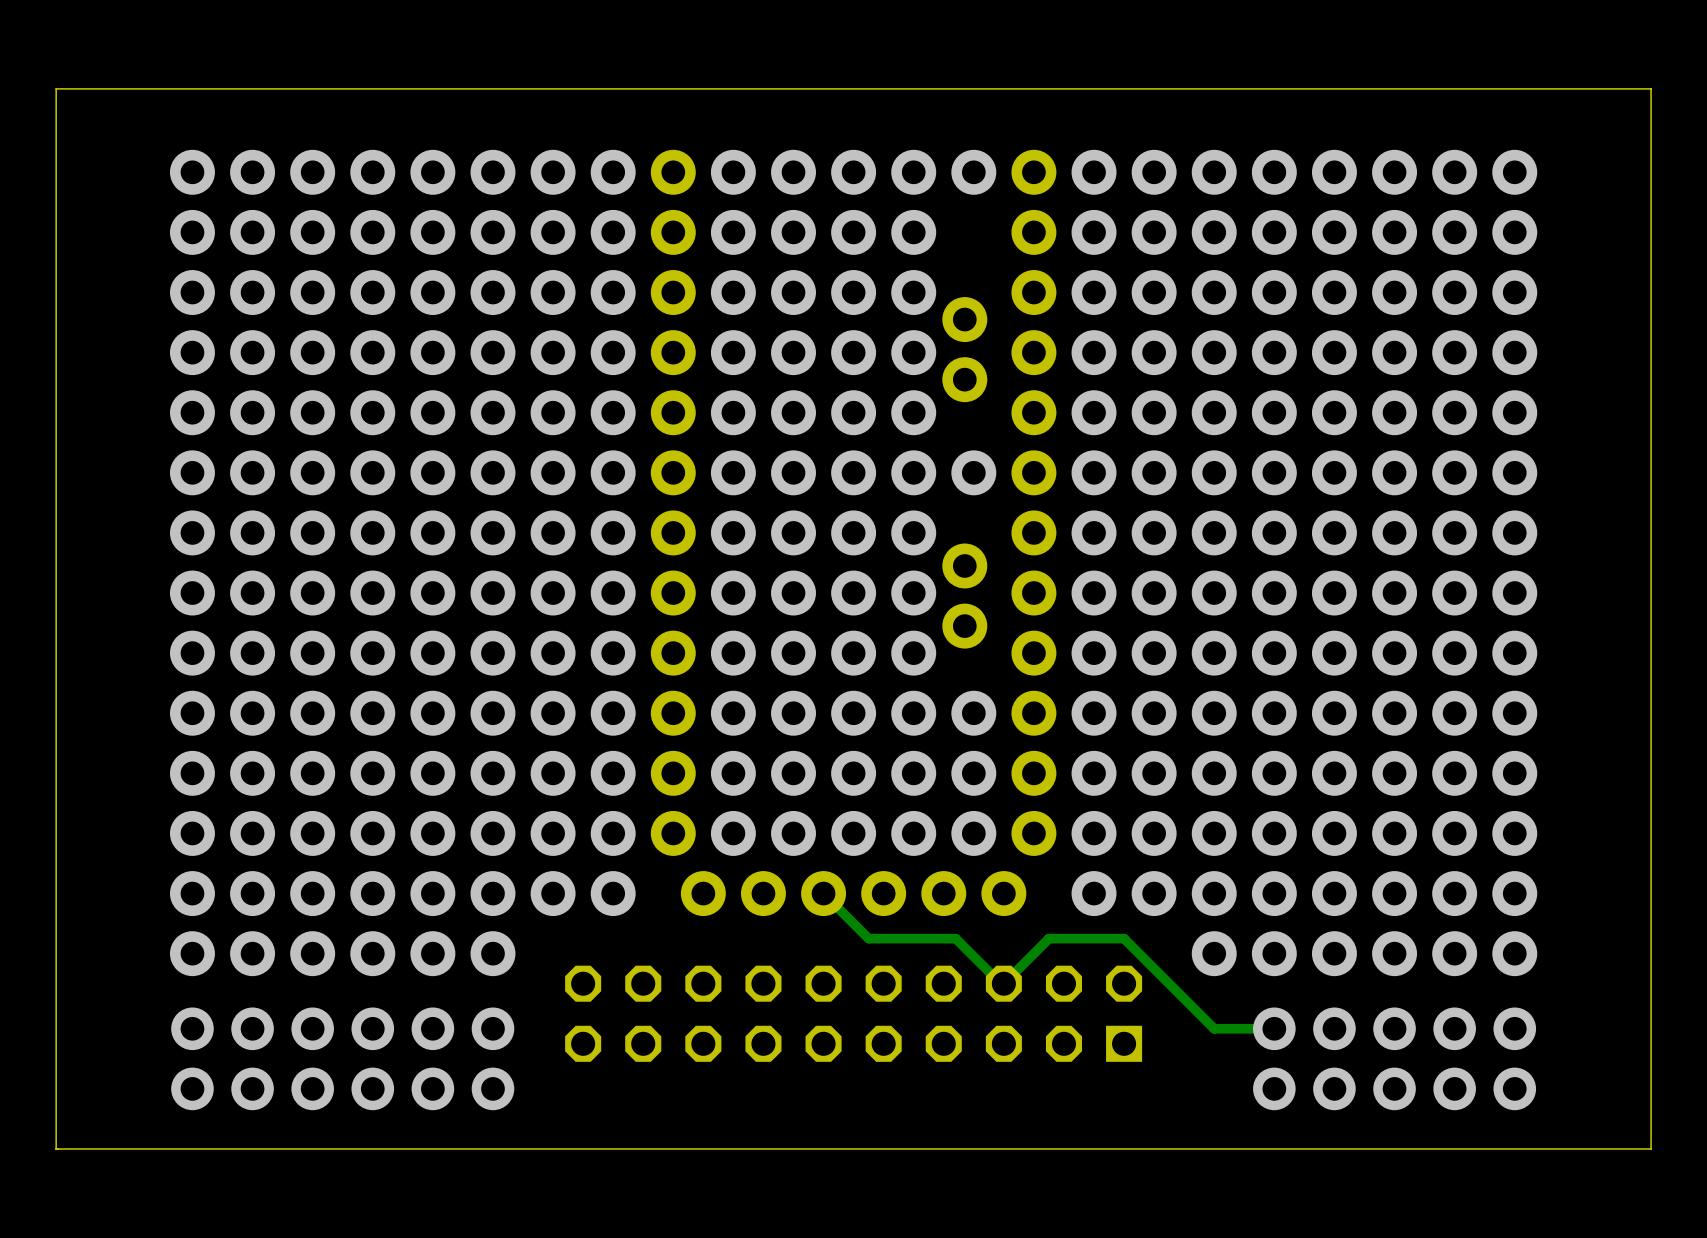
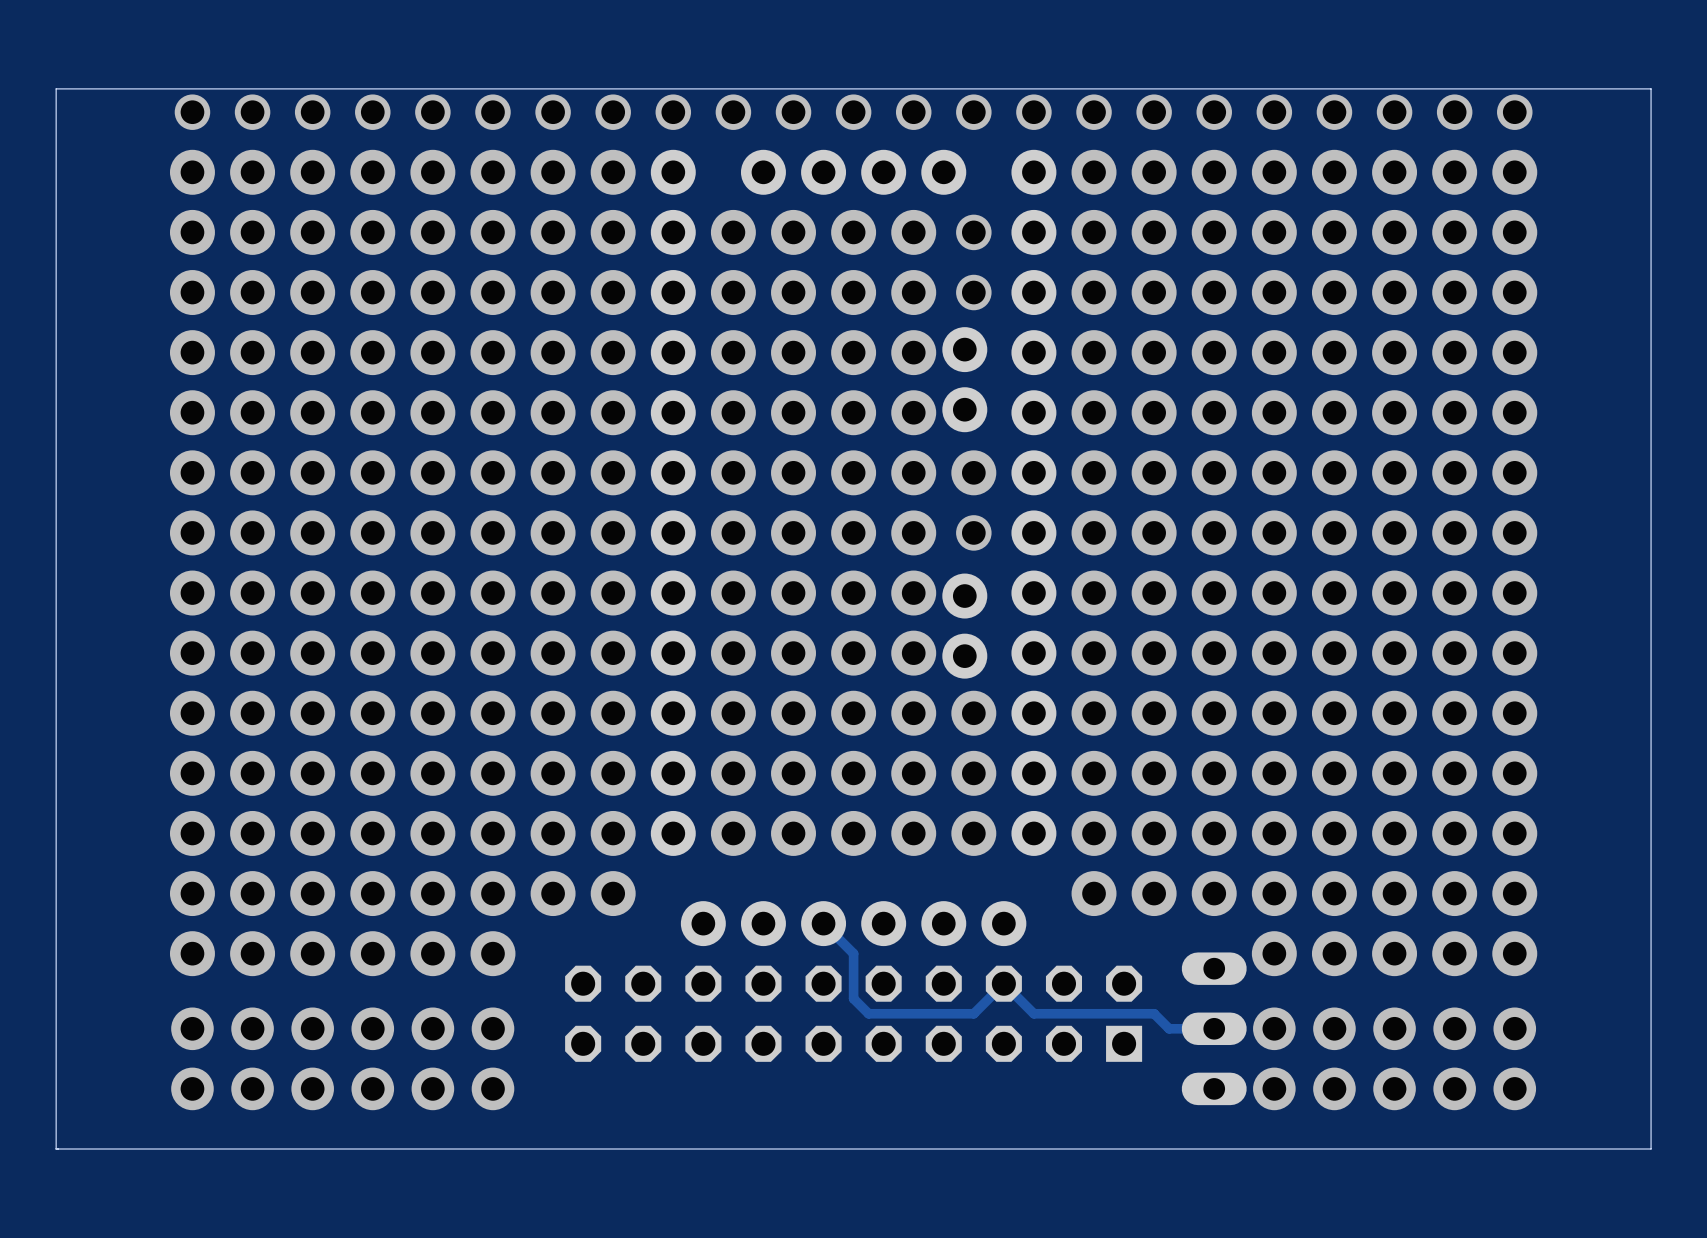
via: none -> (192, 112)
via: none -> (252, 112)
via: none -> (312, 112)
via: none -> (372, 112)
via: none -> (432, 112)
via: none -> (492, 112)
via: none -> (553, 112)
via: none -> (613, 112)
via: none -> (673, 112)
via: none -> (733, 112)
via: none -> (793, 112)
via: none -> (853, 112)
via: none -> (913, 112)
via: none -> (973, 112)
via: none -> (1033, 112)
via: none -> (1094, 112)
via: none -> (1154, 112)
via: none -> (1214, 112)
via: none -> (1274, 112)
via: none -> (1334, 112)
via: none -> (1394, 112)
via: none -> (1454, 112)
via: none -> (1514, 112)
part footprint: [650, 149, 1057, 917] -> [650, 149, 1057, 947]
via: (733, 172) -> none
via: (793, 172) -> none
via: (853, 172) -> none
via: (913, 172) -> none
via: (973, 172) -> none
via: none -> (973, 232)
via: none -> (973, 292)
via: none -> (973, 532)
track: (823, 893) (868, 938) (955, 938) (1000, 983) (1003, 983) (1048, 938) (1124, 938) (1214, 1028) (1274, 1028) -> none
track: none -> (823, 923) (853, 953) (853, 998) (868, 1013) (973, 1013) (1003, 983) (1033, 1013) (1154, 1013) (1169, 1028) (1214, 1028)
via: (1214, 953) -> none
part: none -> (1214, 1028)

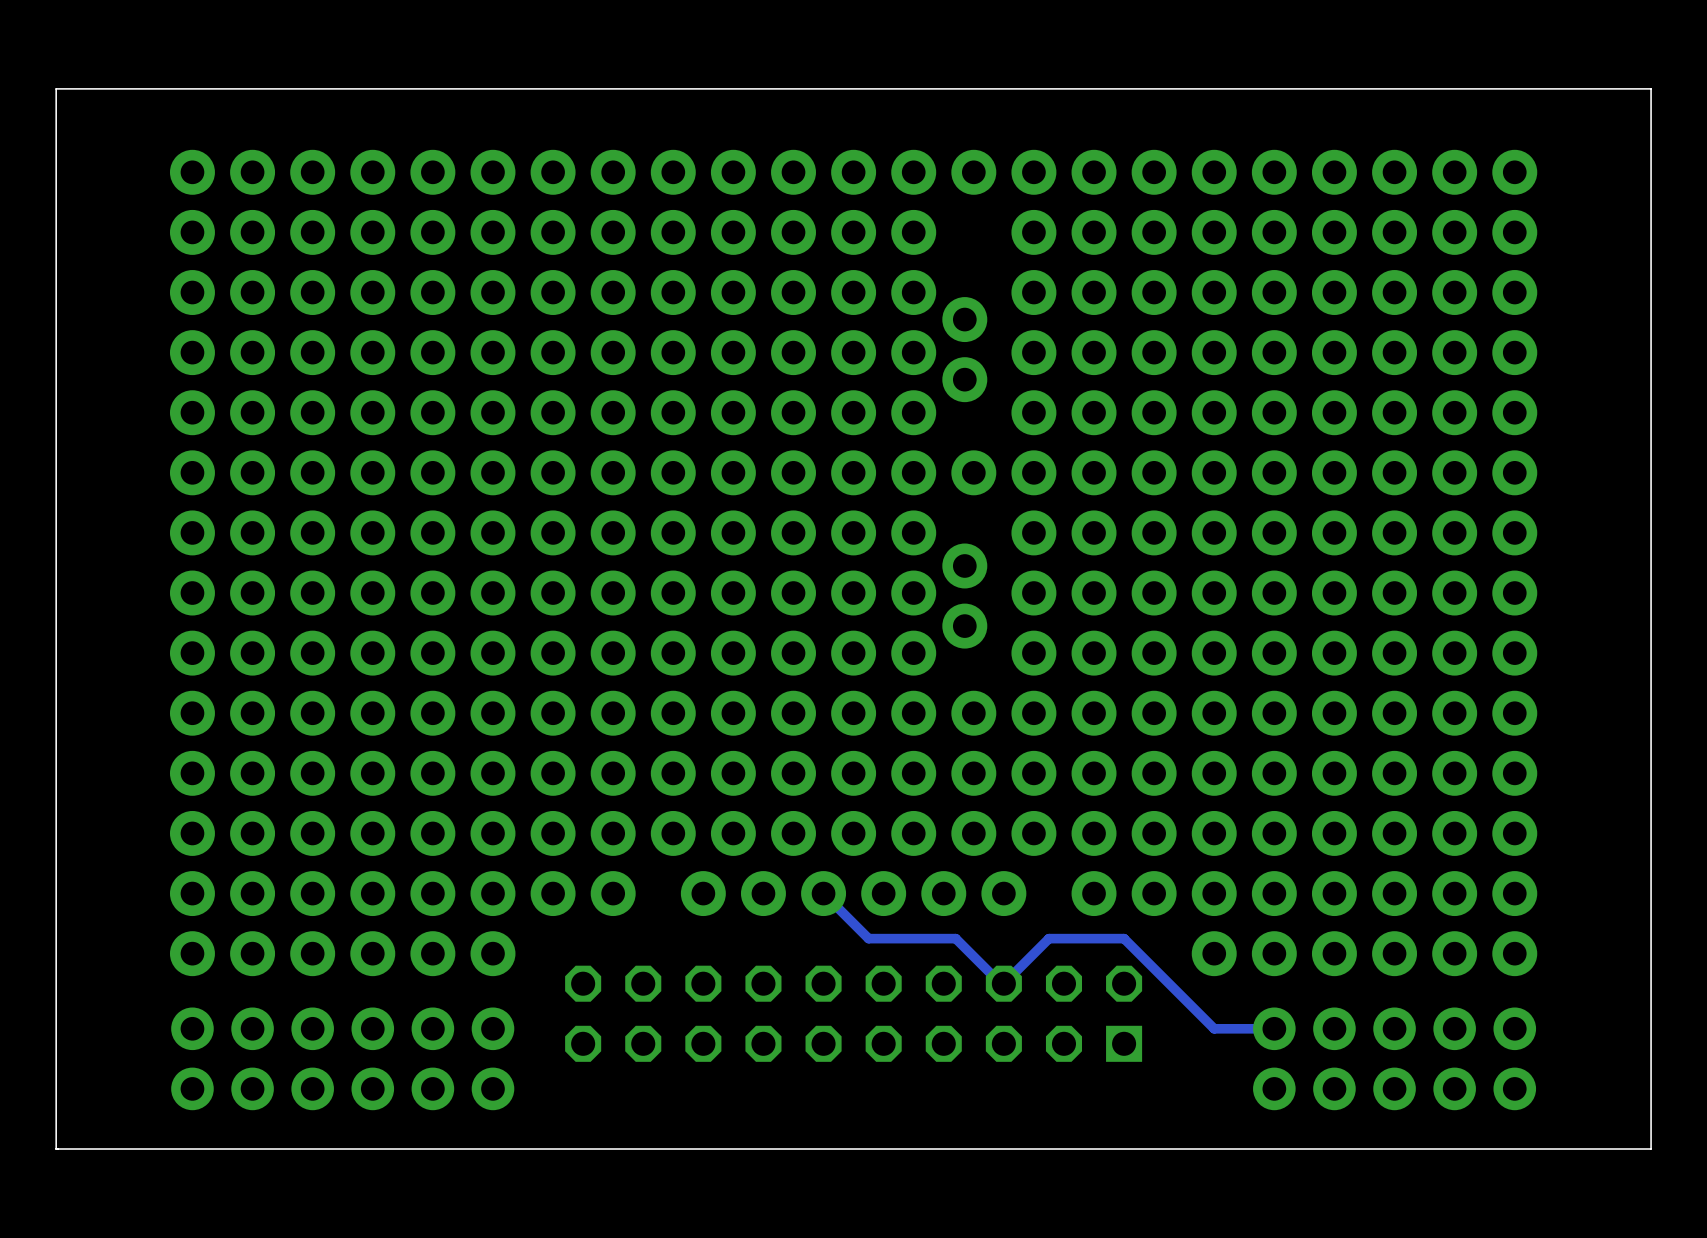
via: (192, 112) -> none
via: (252, 112) -> none
via: (312, 112) -> none
via: (372, 112) -> none
via: (432, 112) -> none
via: (492, 112) -> none
via: (553, 112) -> none
via: (613, 112) -> none
via: (673, 112) -> none
via: (733, 112) -> none
via: (793, 112) -> none
via: (853, 112) -> none
via: (913, 112) -> none
via: (973, 112) -> none
via: (1033, 112) -> none
via: (1094, 112) -> none
via: (1154, 112) -> none
via: (1214, 112) -> none
via: (1274, 112) -> none
via: (1334, 112) -> none
via: (1394, 112) -> none
via: (1454, 112) -> none
via: (1514, 112) -> none
part footprint: [650, 149, 1057, 947] -> [650, 149, 1057, 917]
via: none -> (733, 172)
via: none -> (793, 172)
via: none -> (853, 172)
via: none -> (913, 172)
via: none -> (973, 172)
via: (973, 232) -> none
via: (973, 292) -> none
via: (973, 532) -> none
track: none -> (823, 893) (868, 938) (955, 938) (1000, 983) (1003, 983) (1048, 938) (1124, 938) (1214, 1028) (1274, 1028)
track: (823, 923) (853, 953) (853, 998) (868, 1013) (973, 1013) (1003, 983) (1033, 1013) (1154, 1013) (1169, 1028) (1214, 1028) -> none
via: none -> (1214, 953)
part: (1214, 1028) -> none

